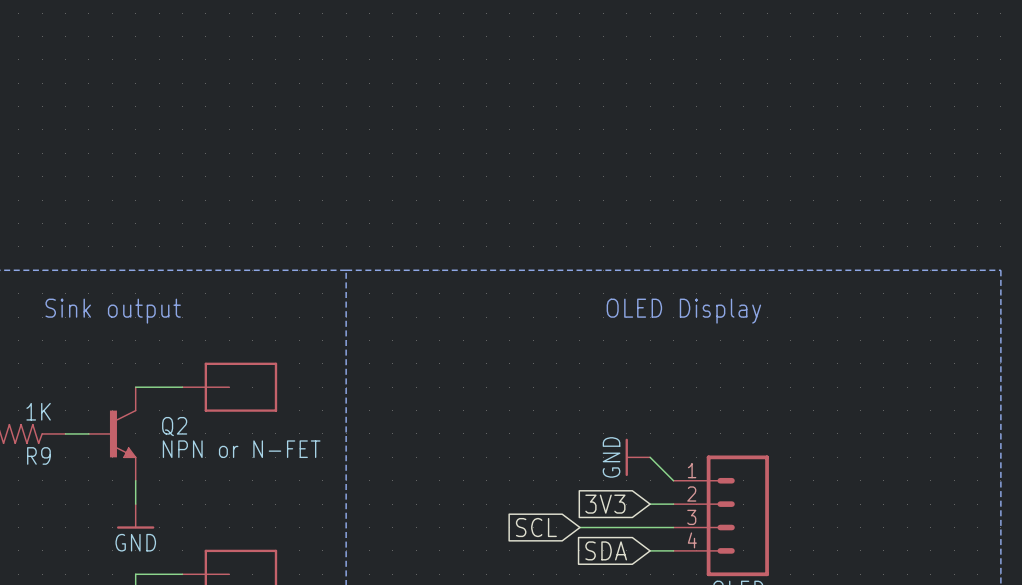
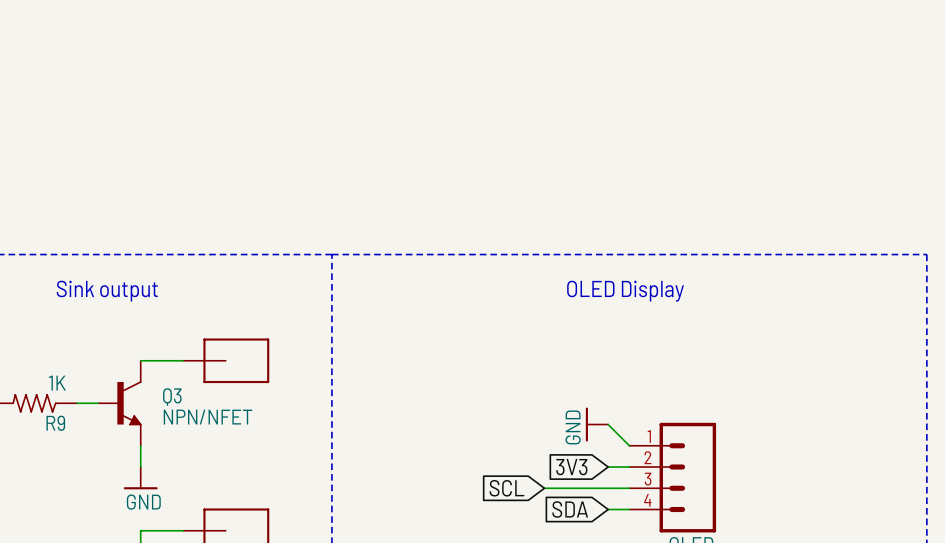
Q2 name: Q2 (174, 426) -> Q3 (172, 396)
Q2 value: NPN or N-FET (241, 449) -> NPN/NFET (207, 417)

